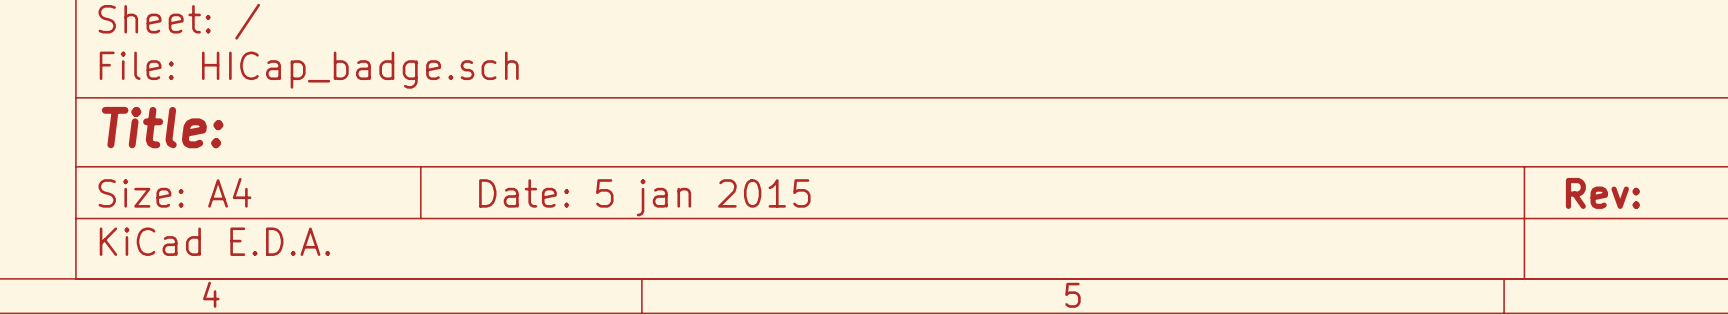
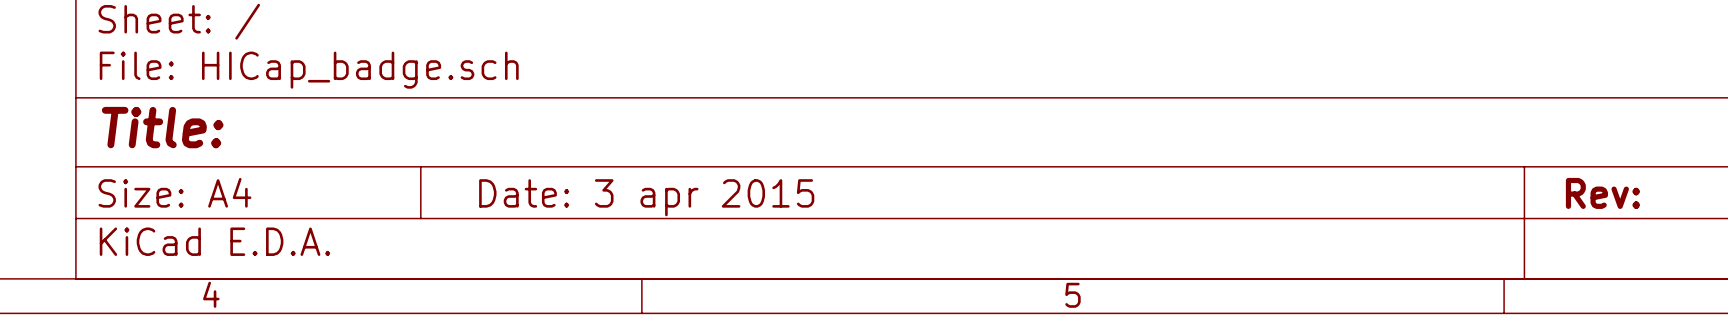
title block: Date: 5 jan 2015 (644, 197) -> Date: 3 apr 2015 (646, 197)

